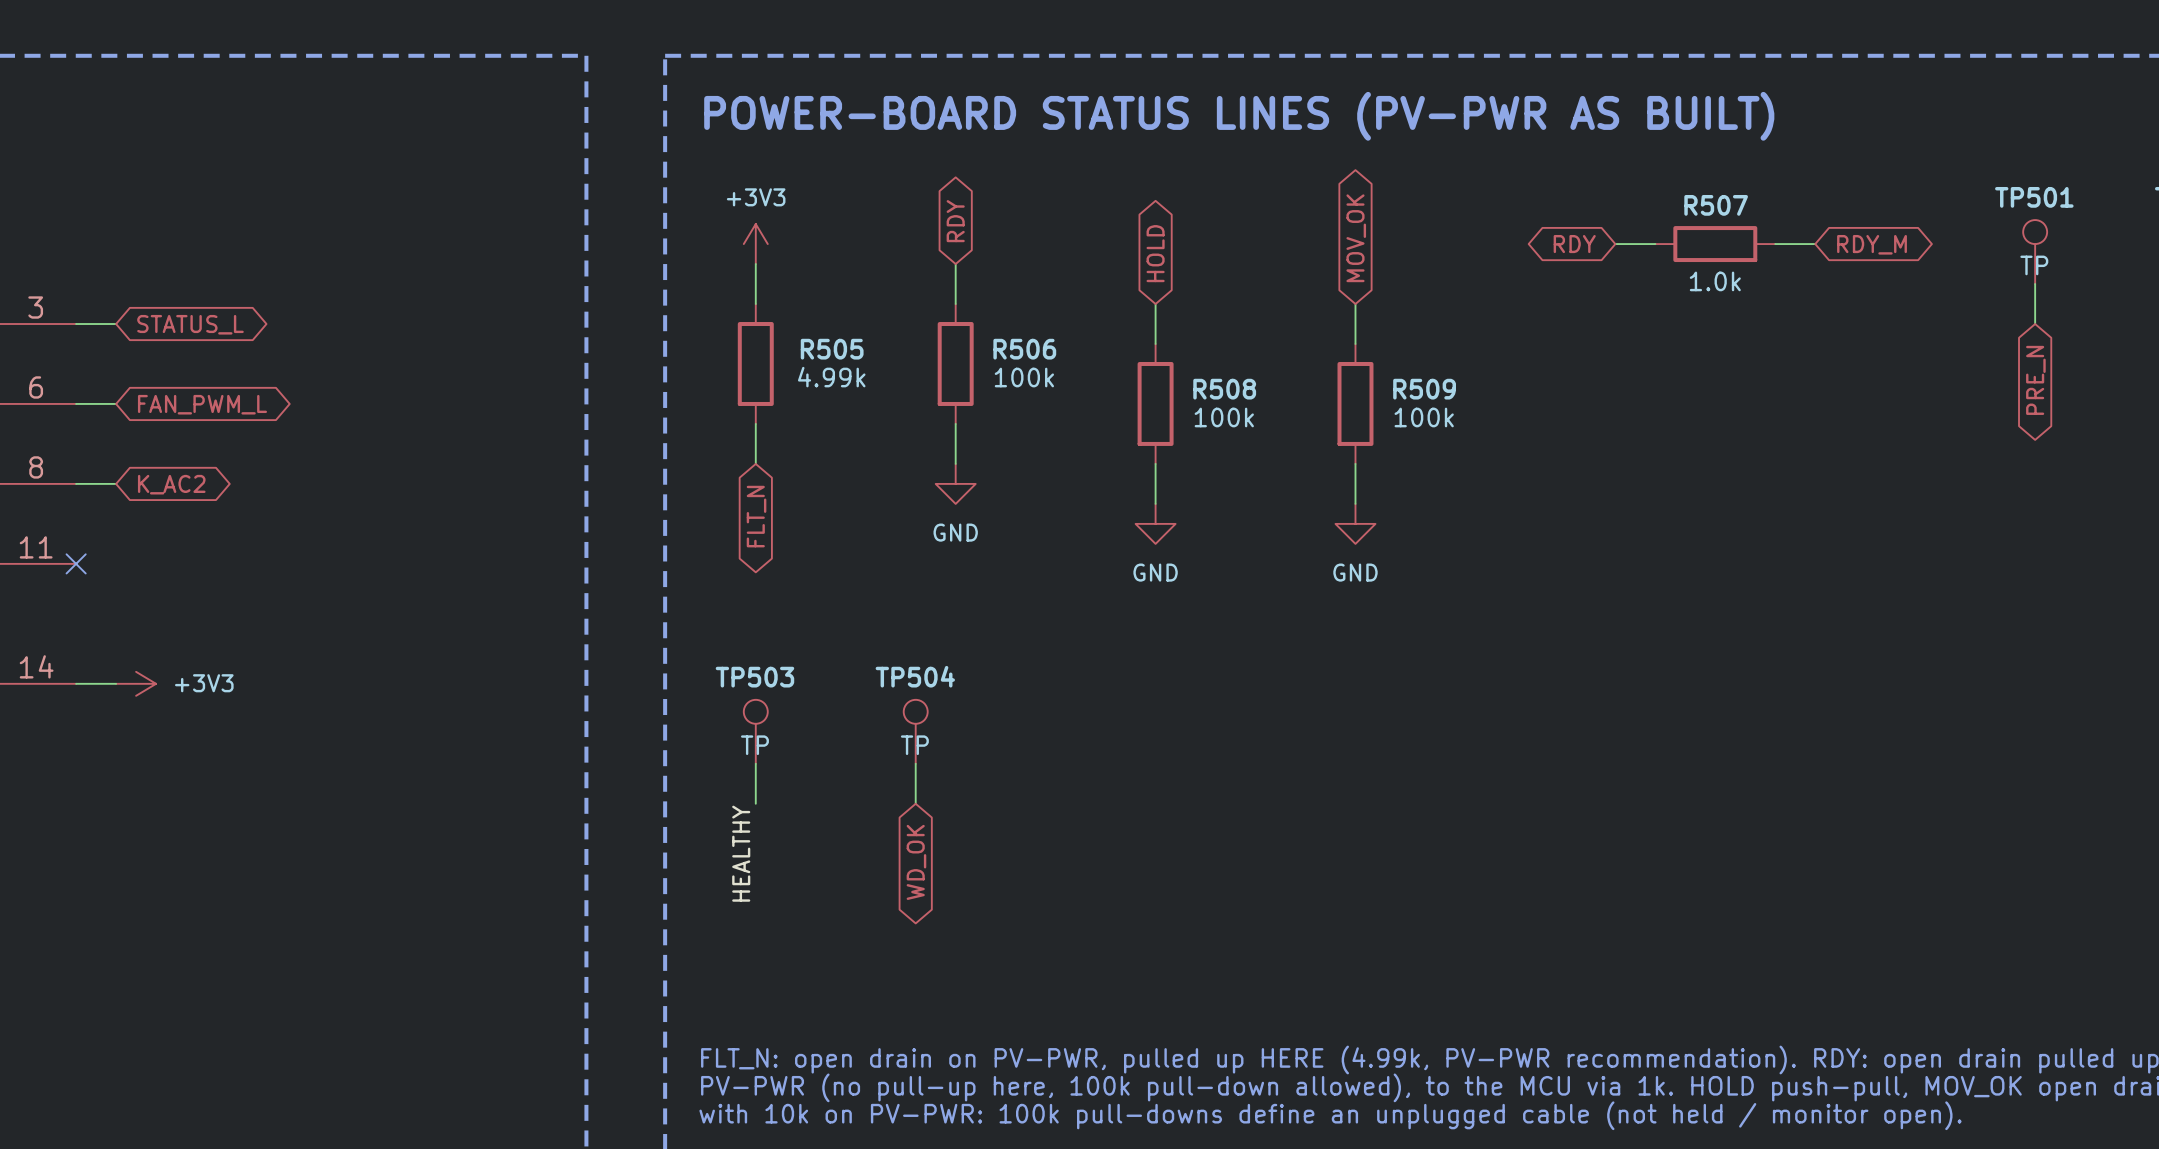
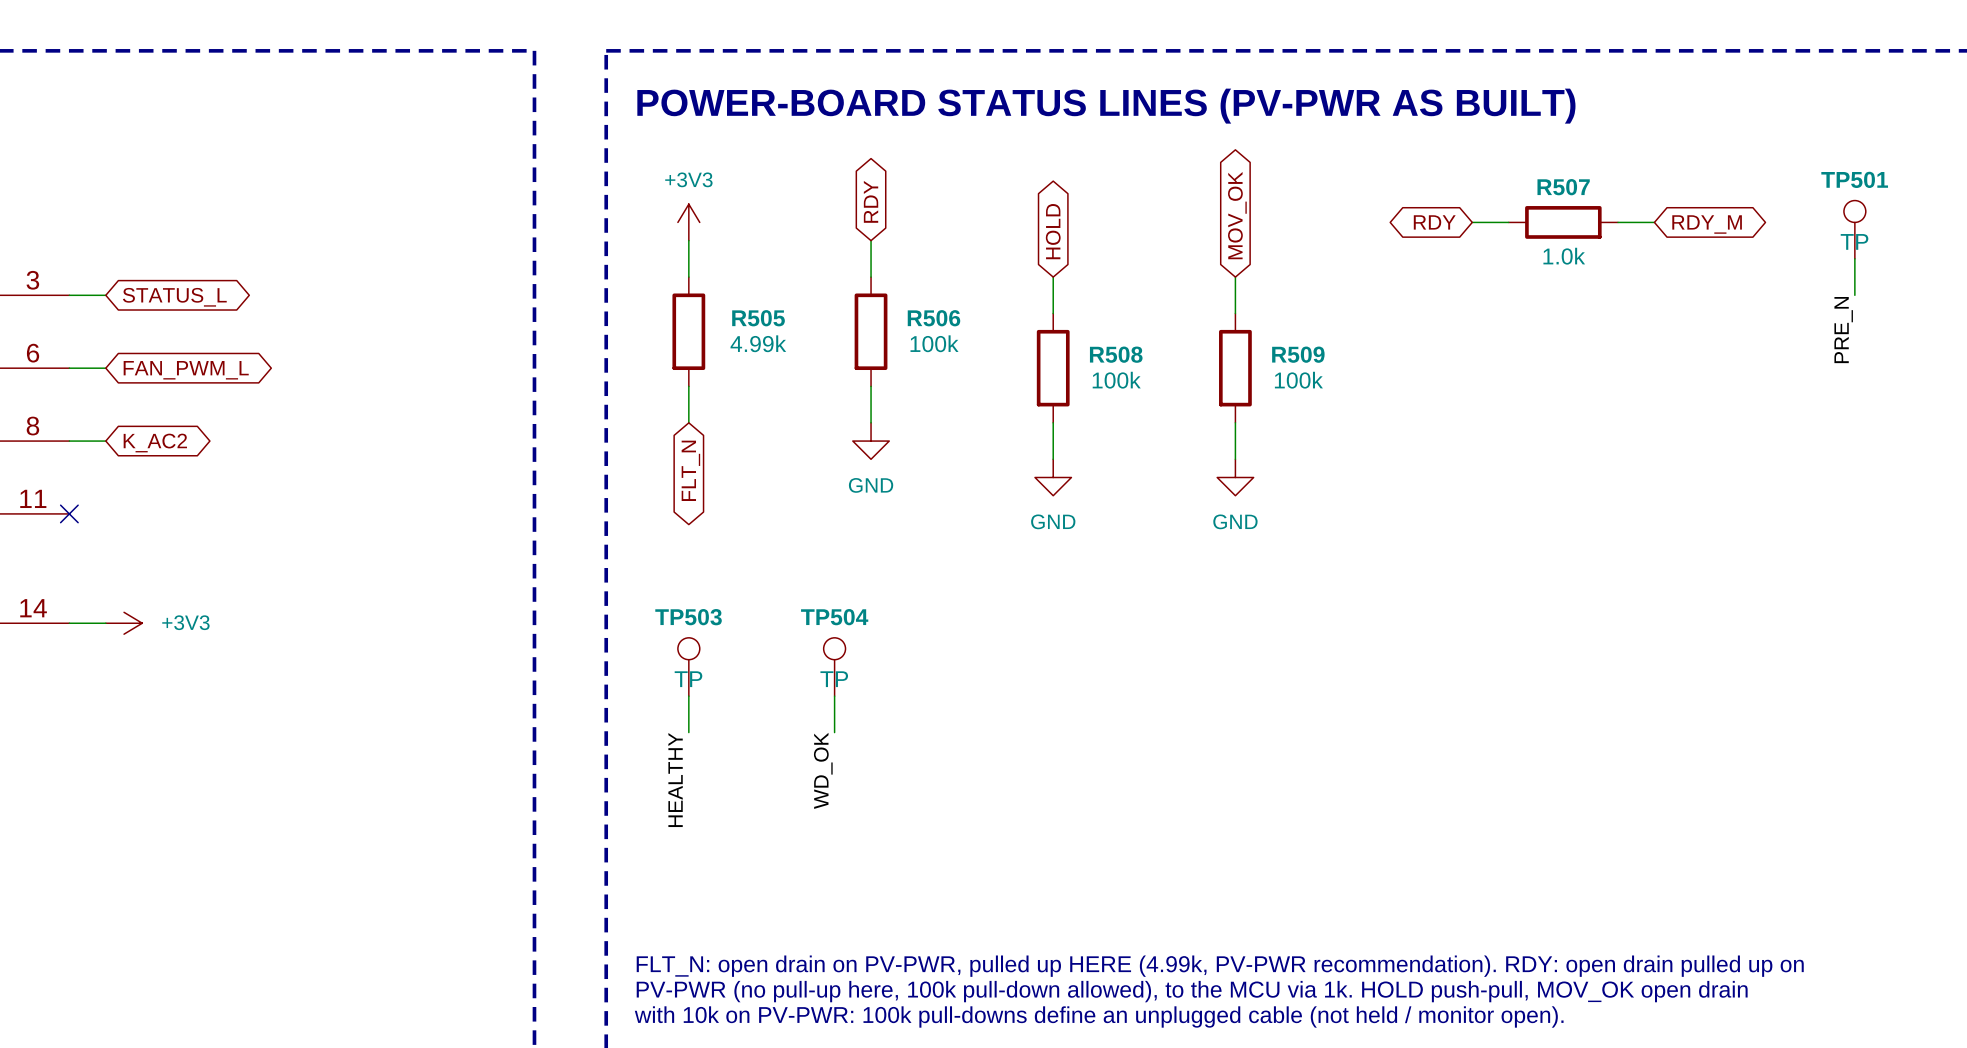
label: none -> PRE_N (1843, 330)
global label: PRE_N (2035, 380) -> none
label: none -> WD_OK (823, 770)
global label: WD_OK (916, 862) -> none

